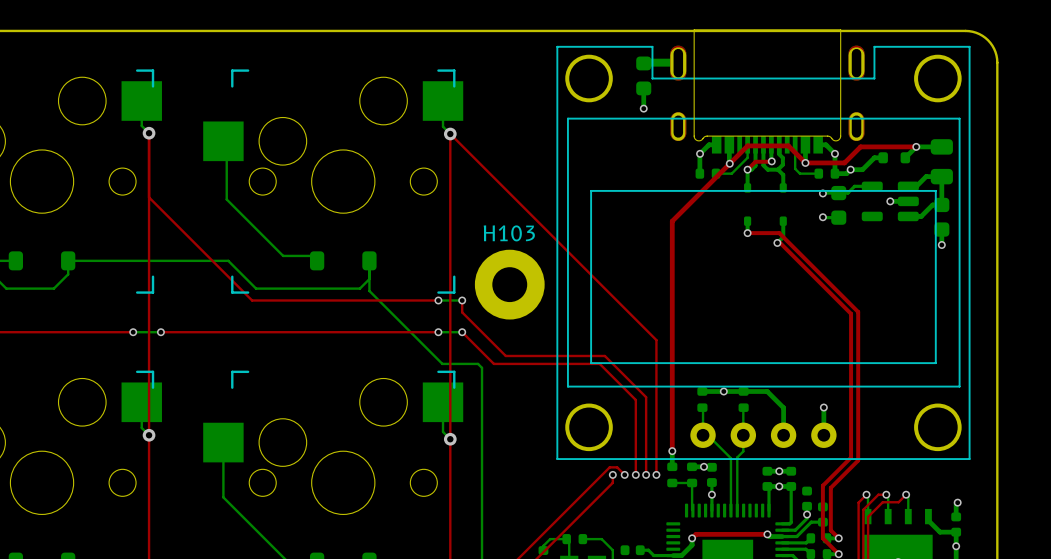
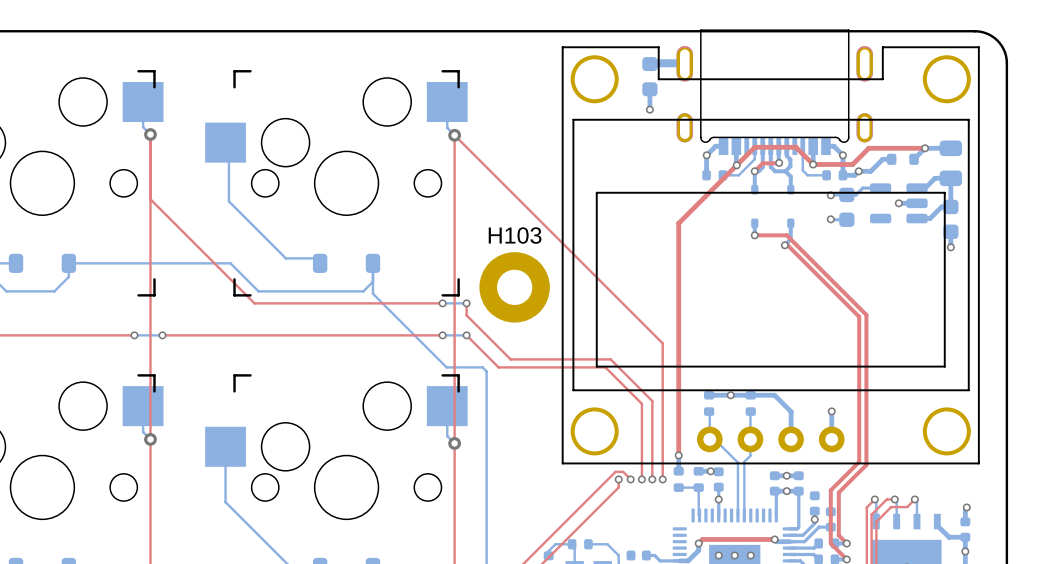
via: none -> (718, 555)
via: none -> (734, 555)
via: none -> (750, 555)

